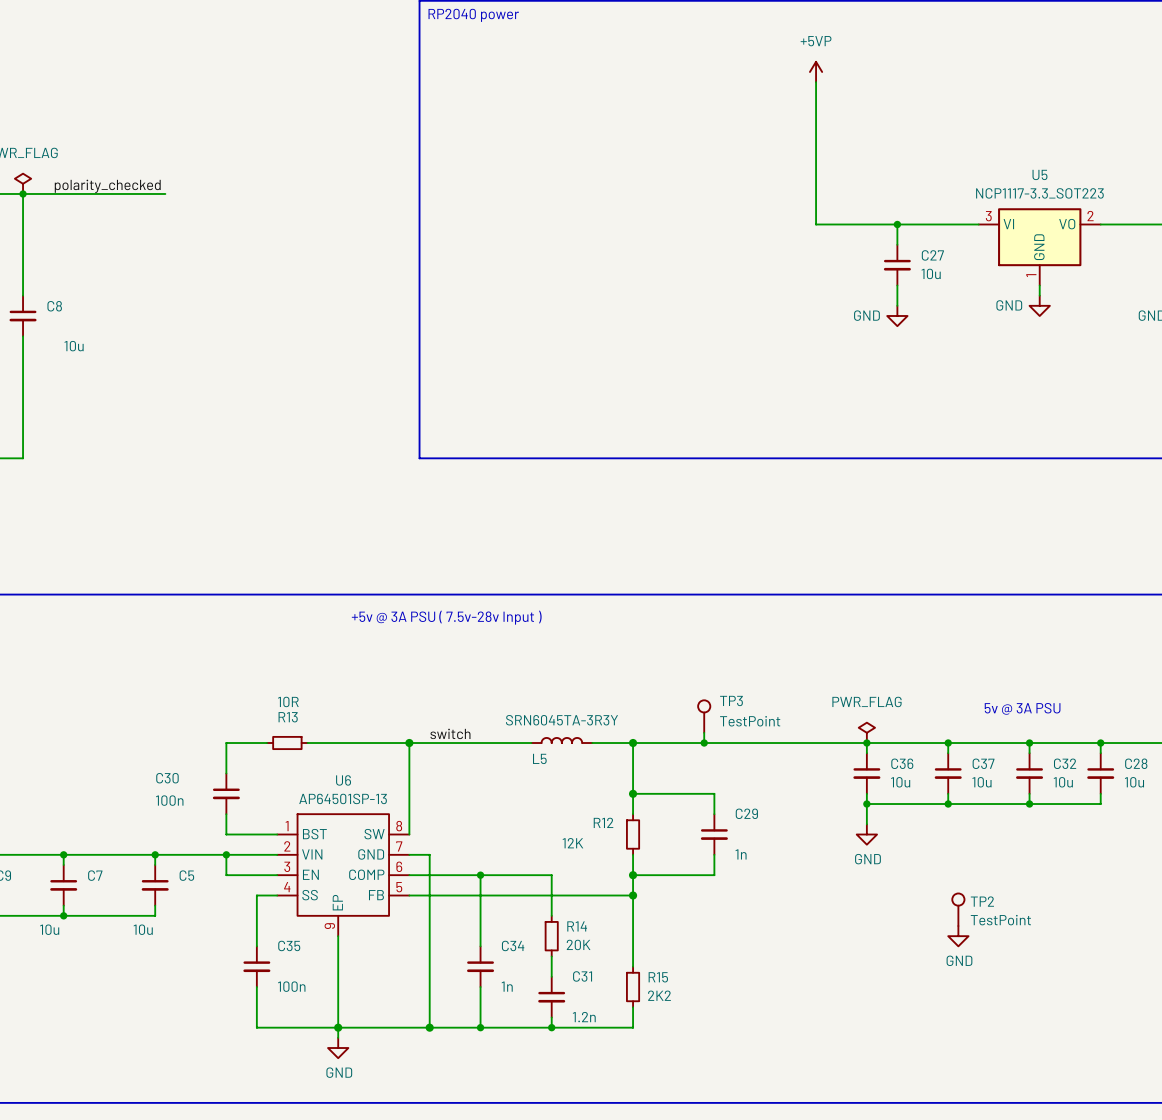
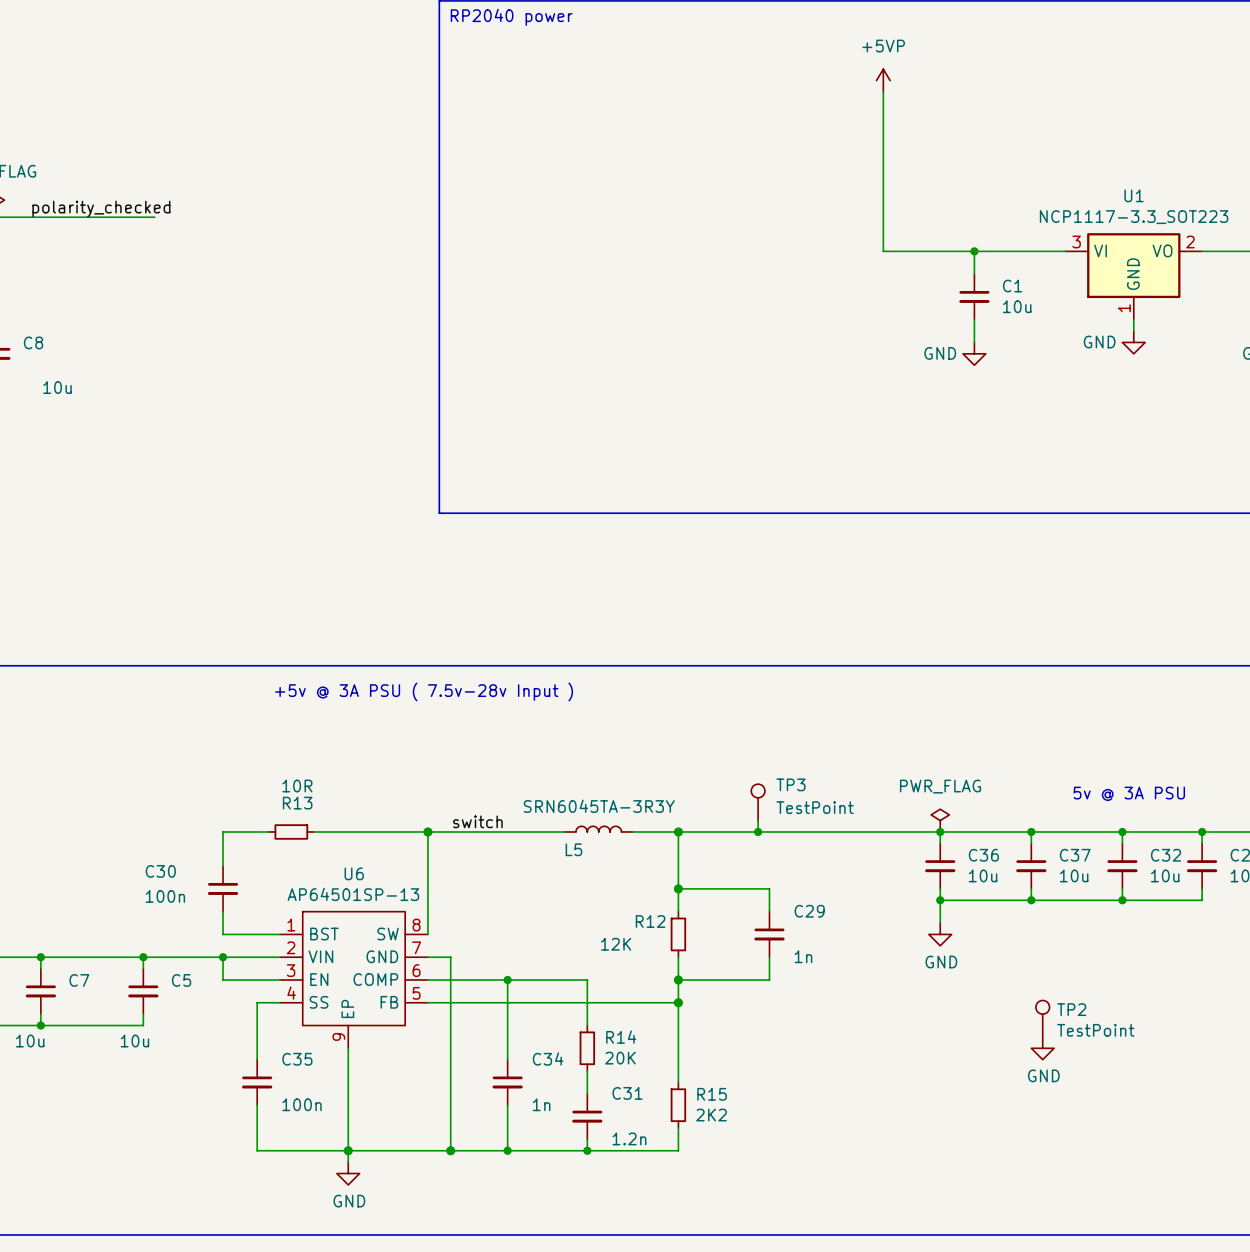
U5 name: U5 (1039, 174) -> U1 (1134, 195)
C27 name: C27 (932, 255) -> C1 (1012, 286)

